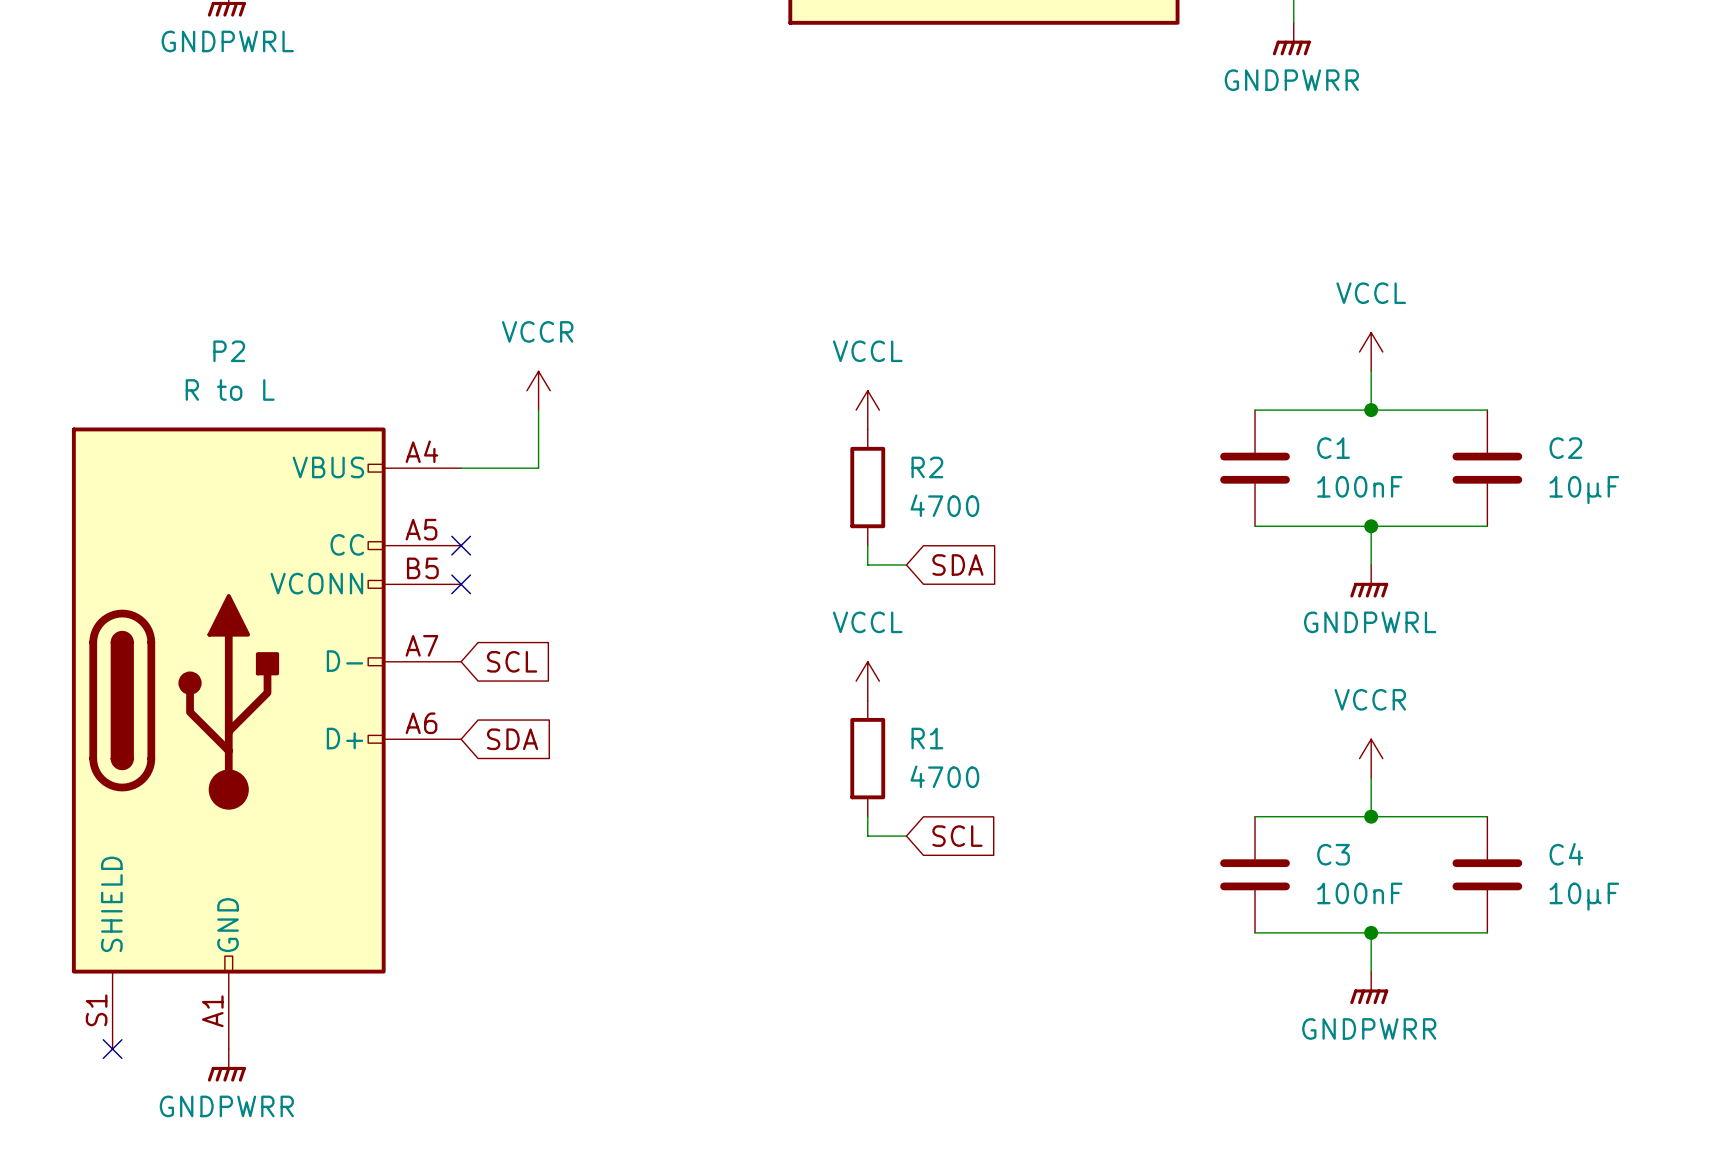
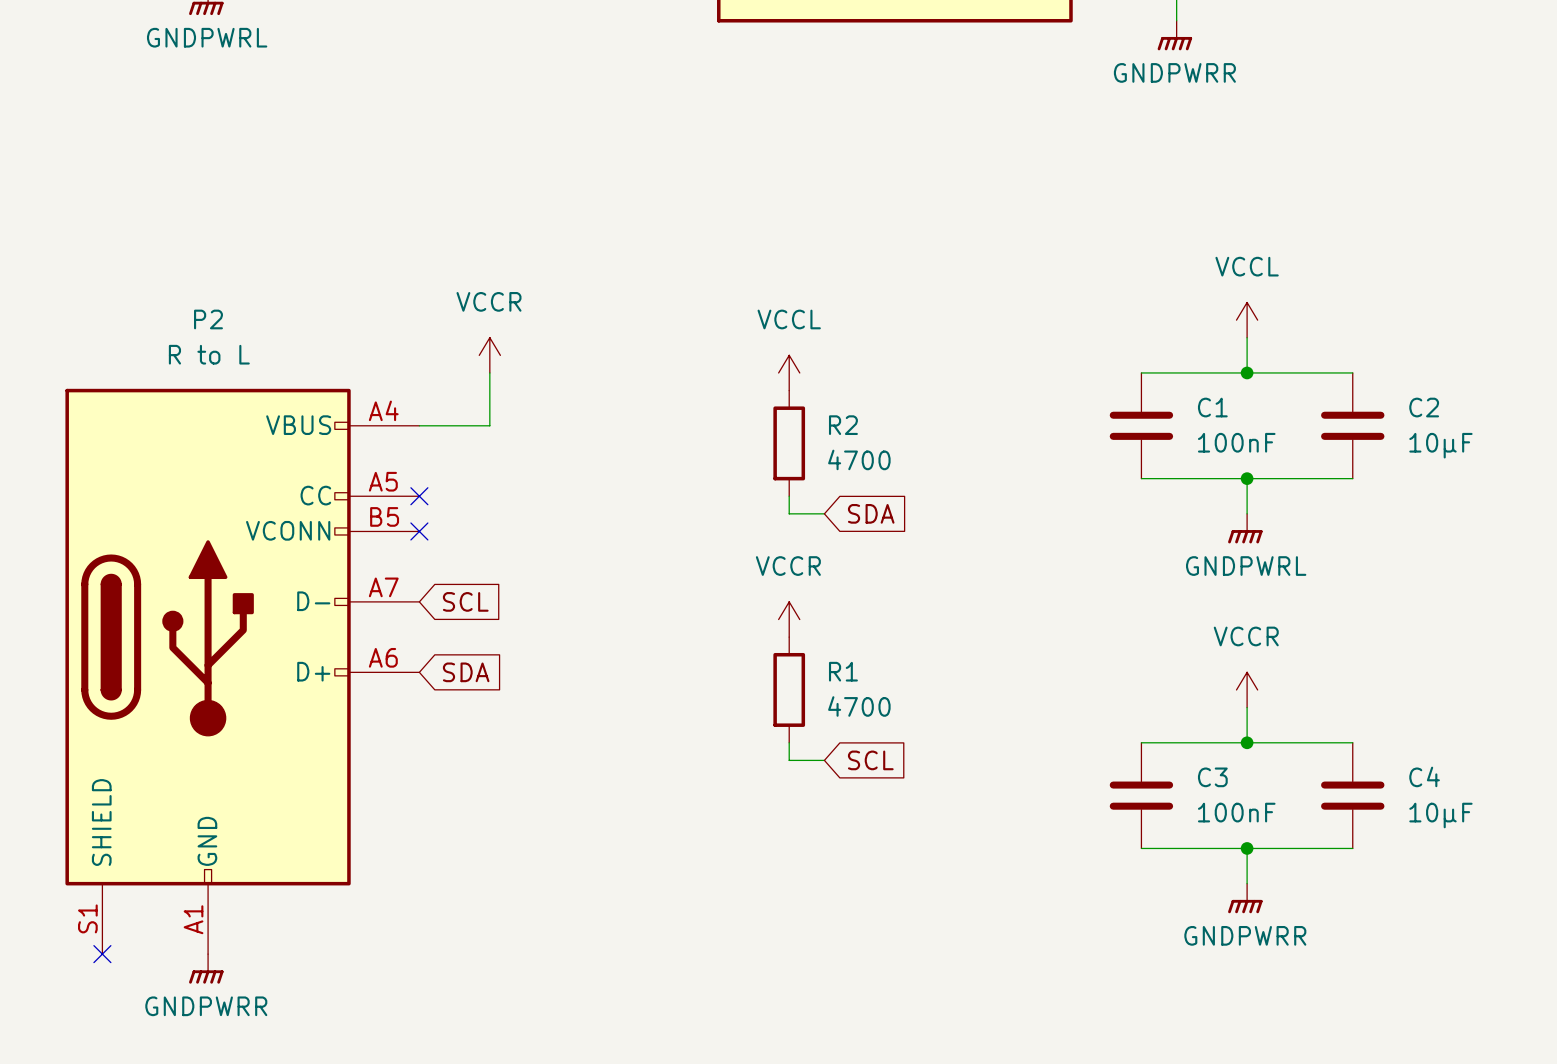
power symbol: VCCL (867, 681) -> VCCR (789, 619)

